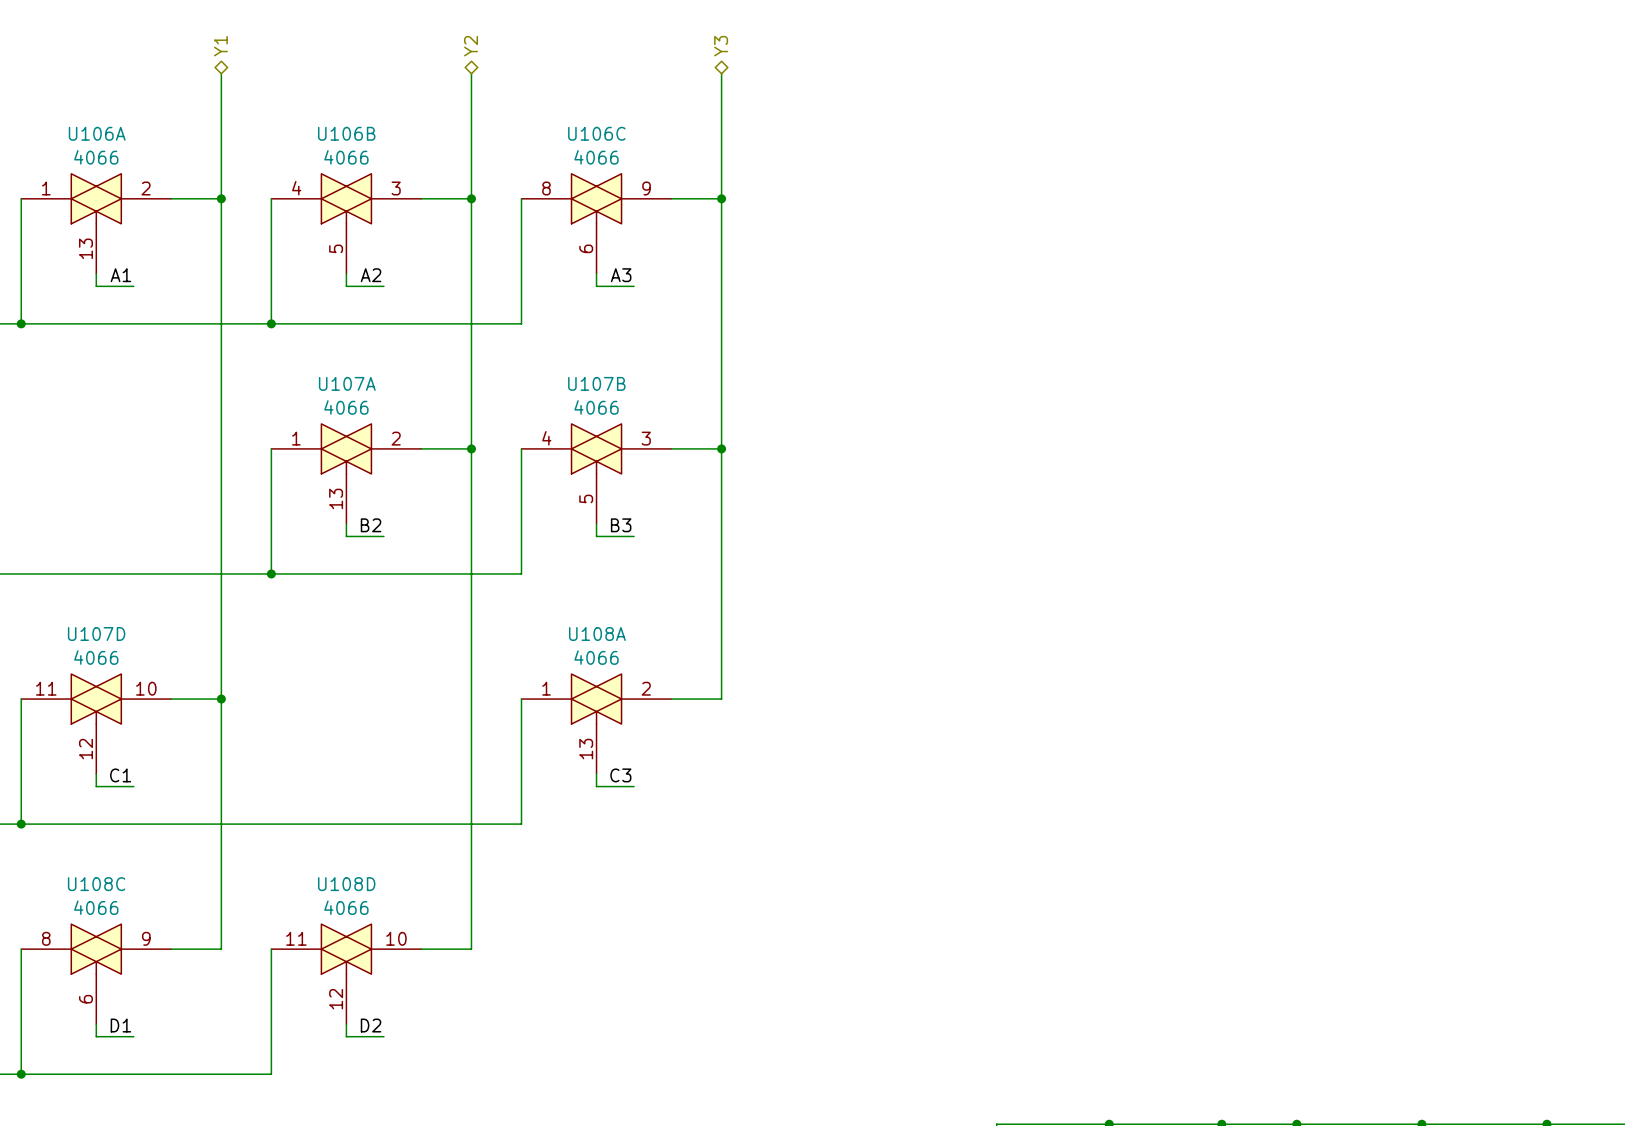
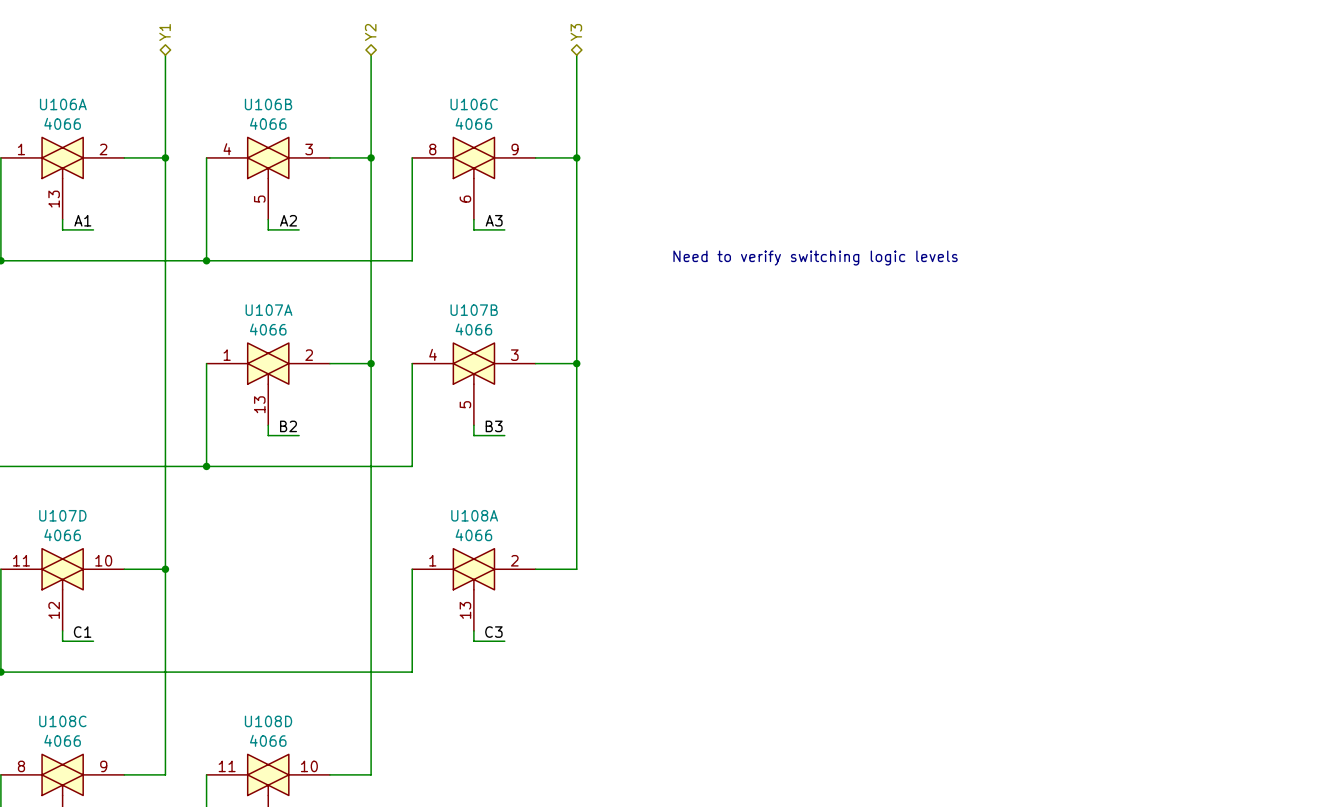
text: none -> Need to verify switching logic levels (815, 258)

